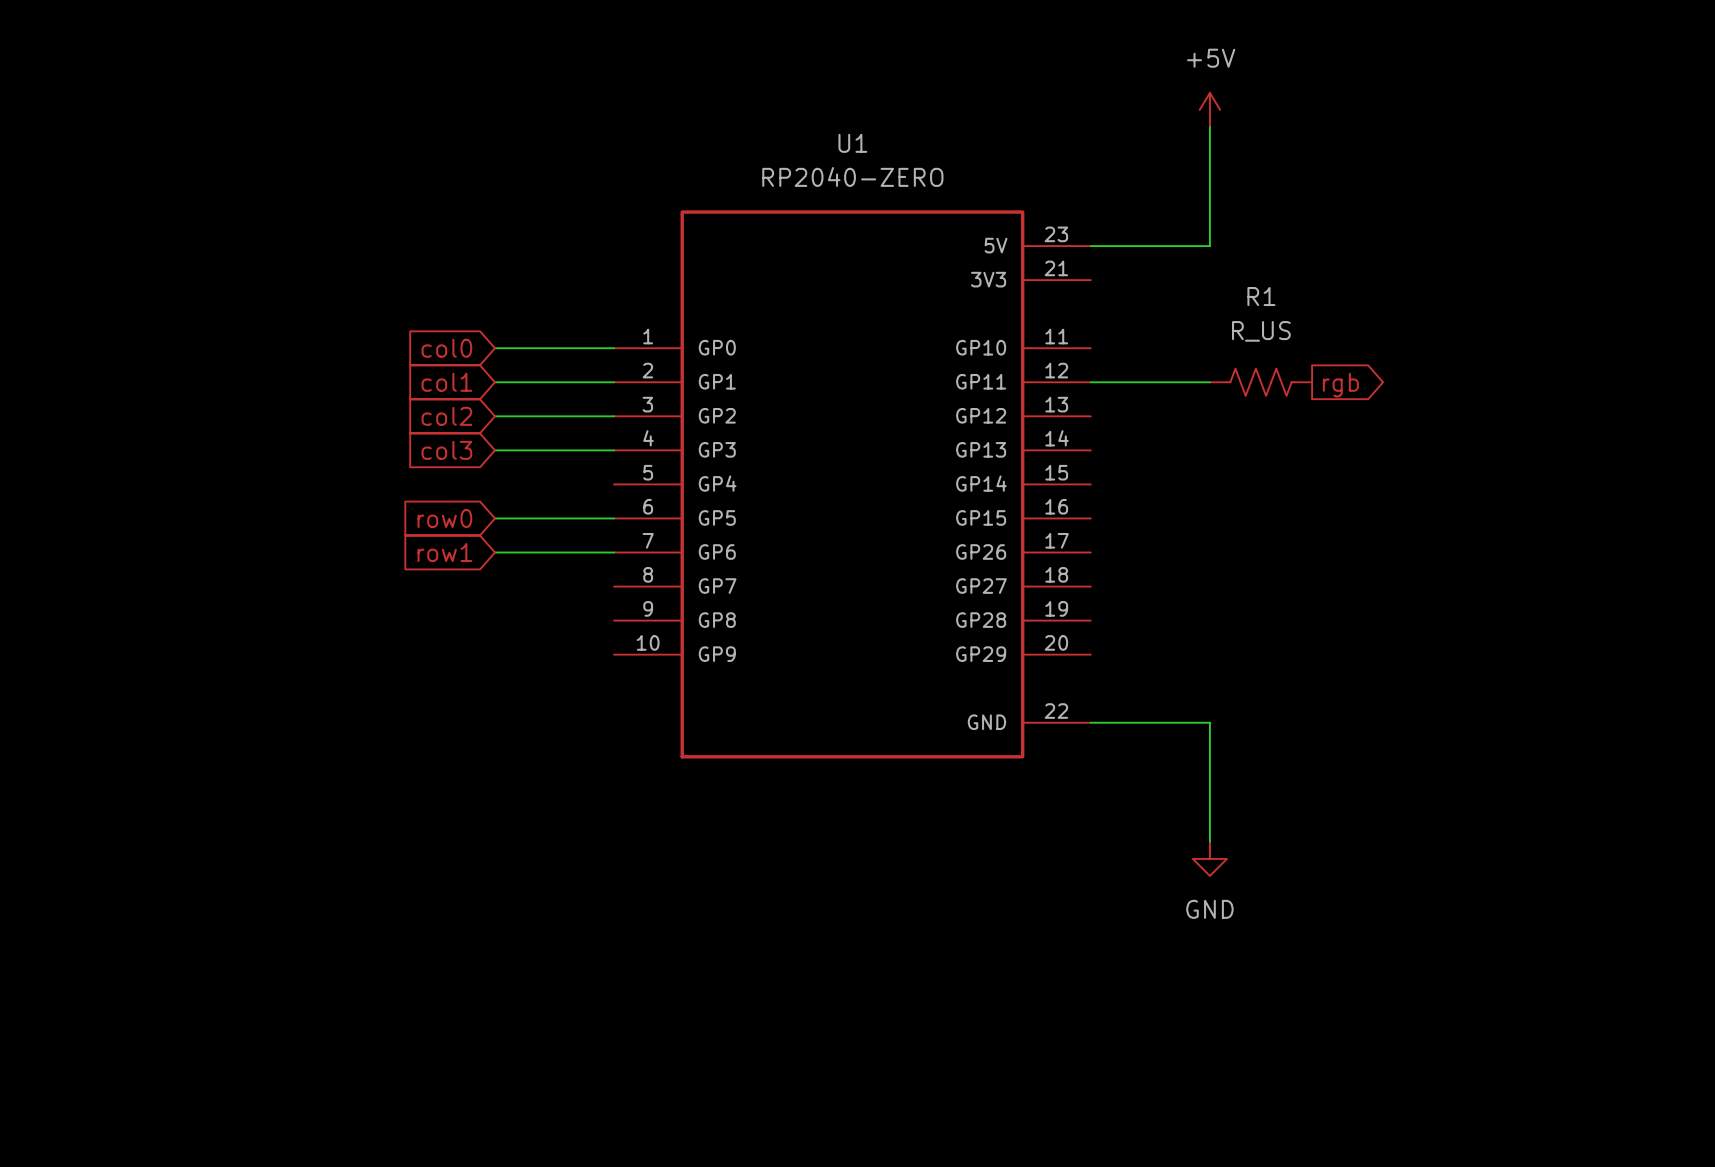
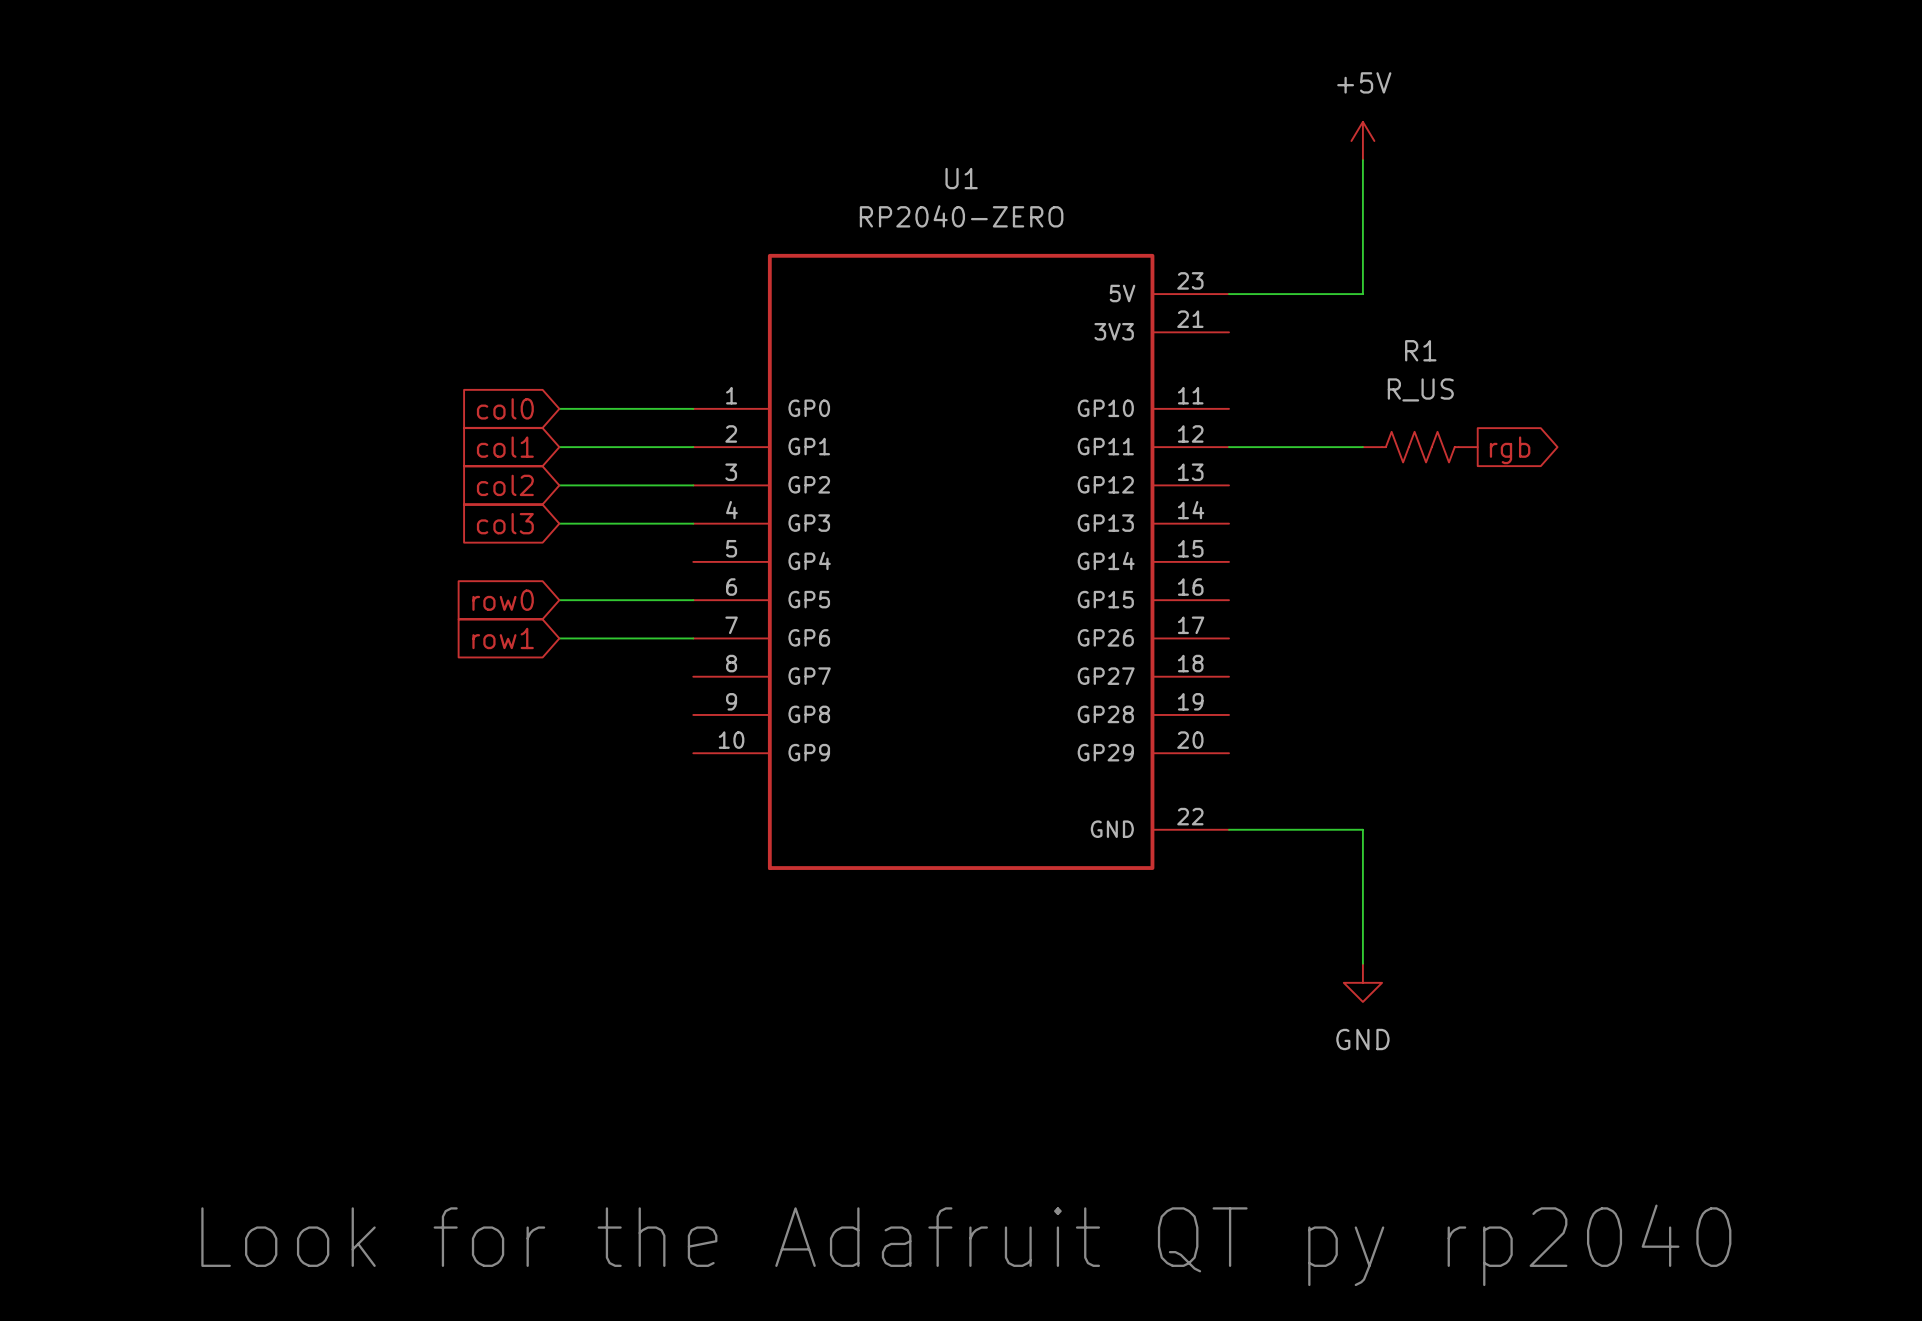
text: none -> Look for the Adafruit QT py rp2040 (966, 1245)

